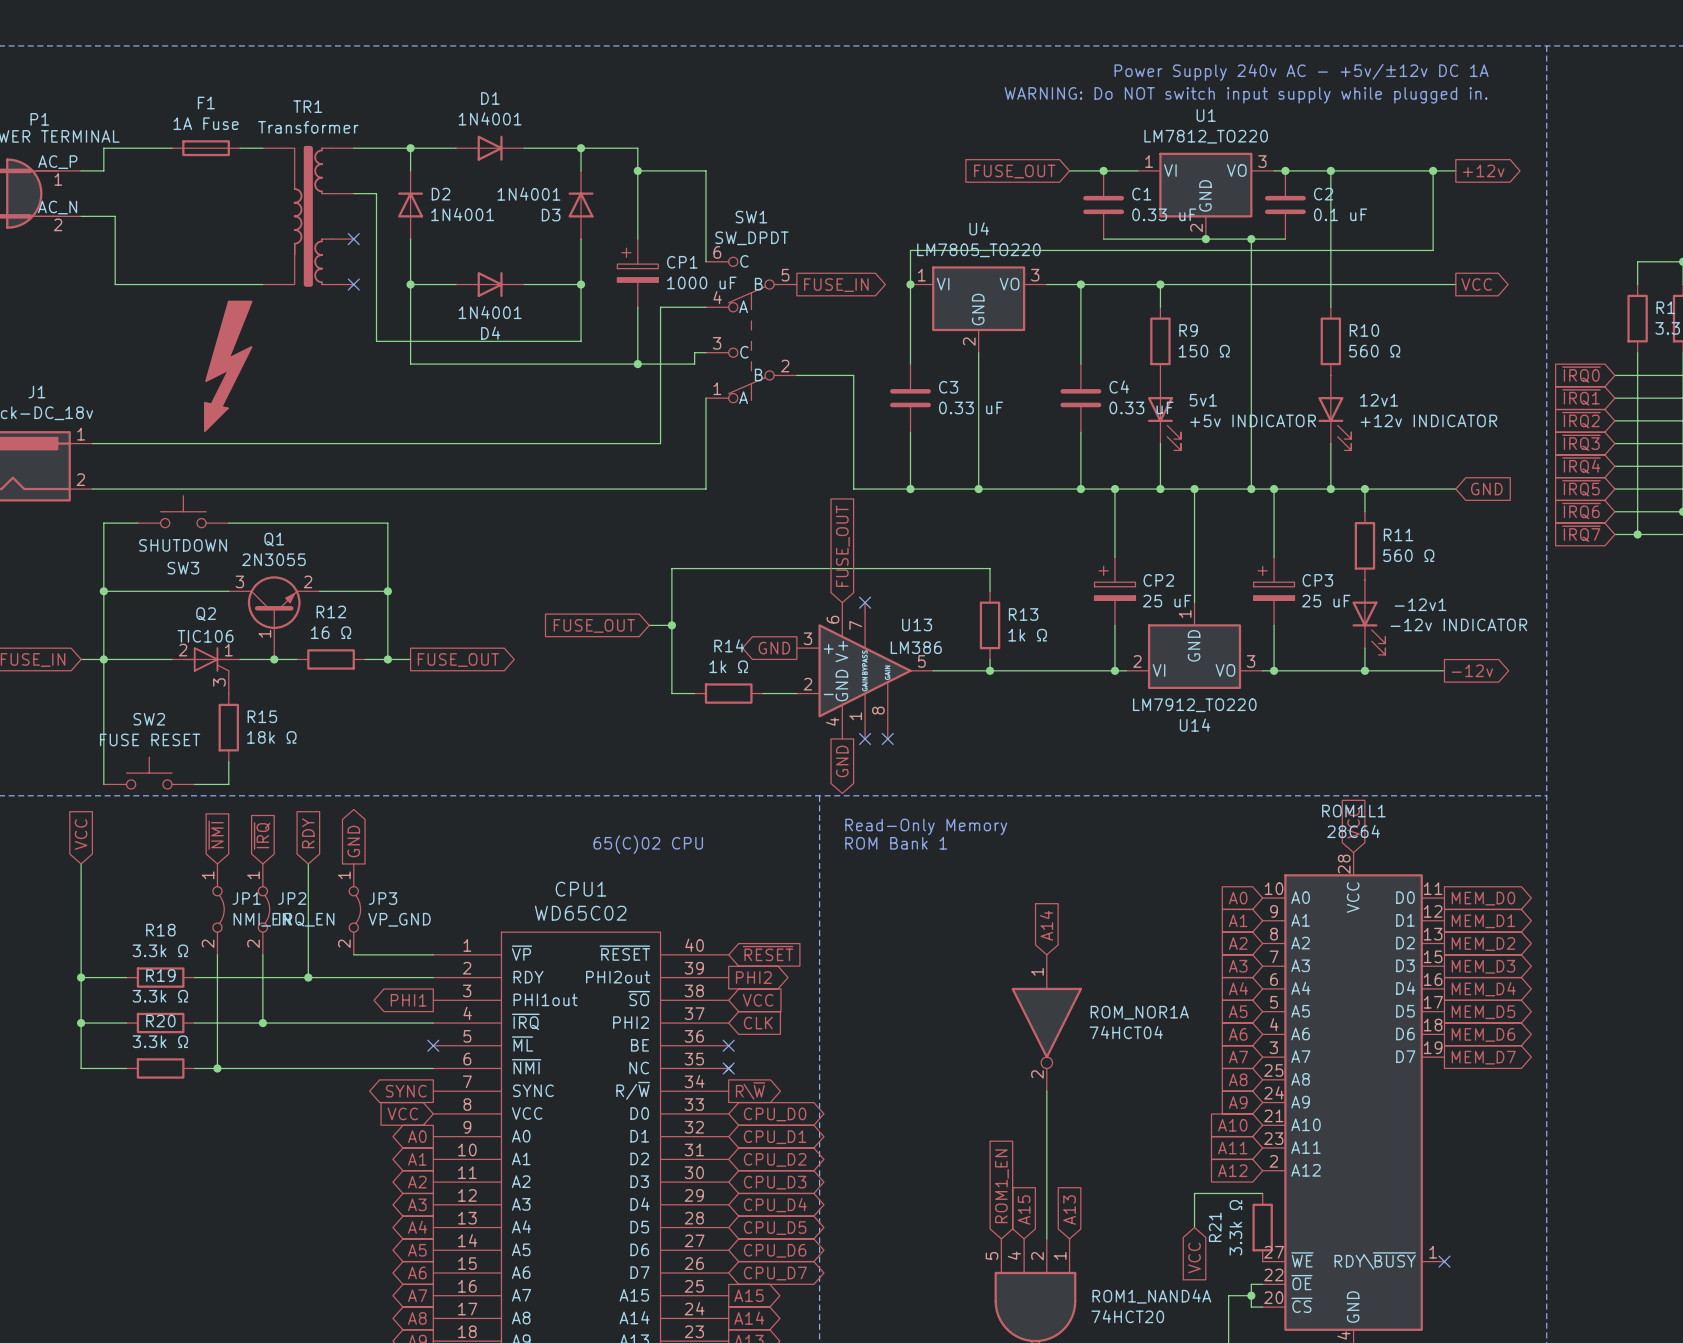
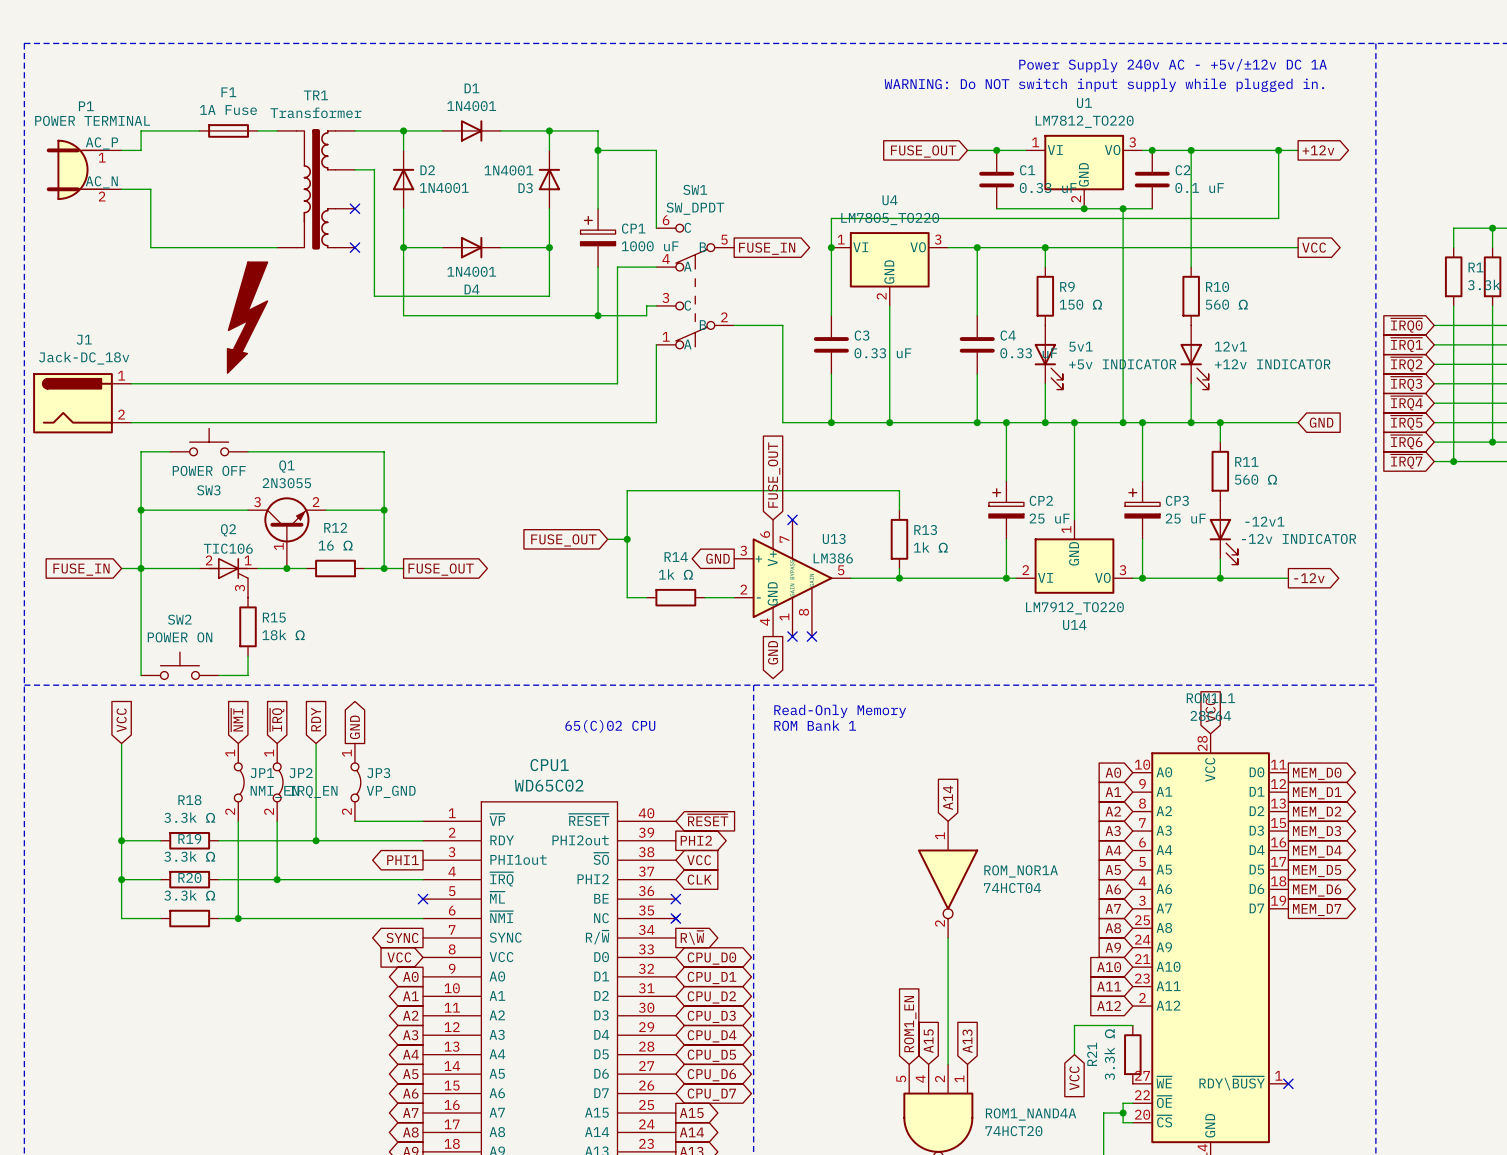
SW3 value: SHUTDOWN (183, 545) -> POWER OFF (209, 470)
SW2 value: FUSE RESET (150, 739) -> POWER ON (180, 637)

